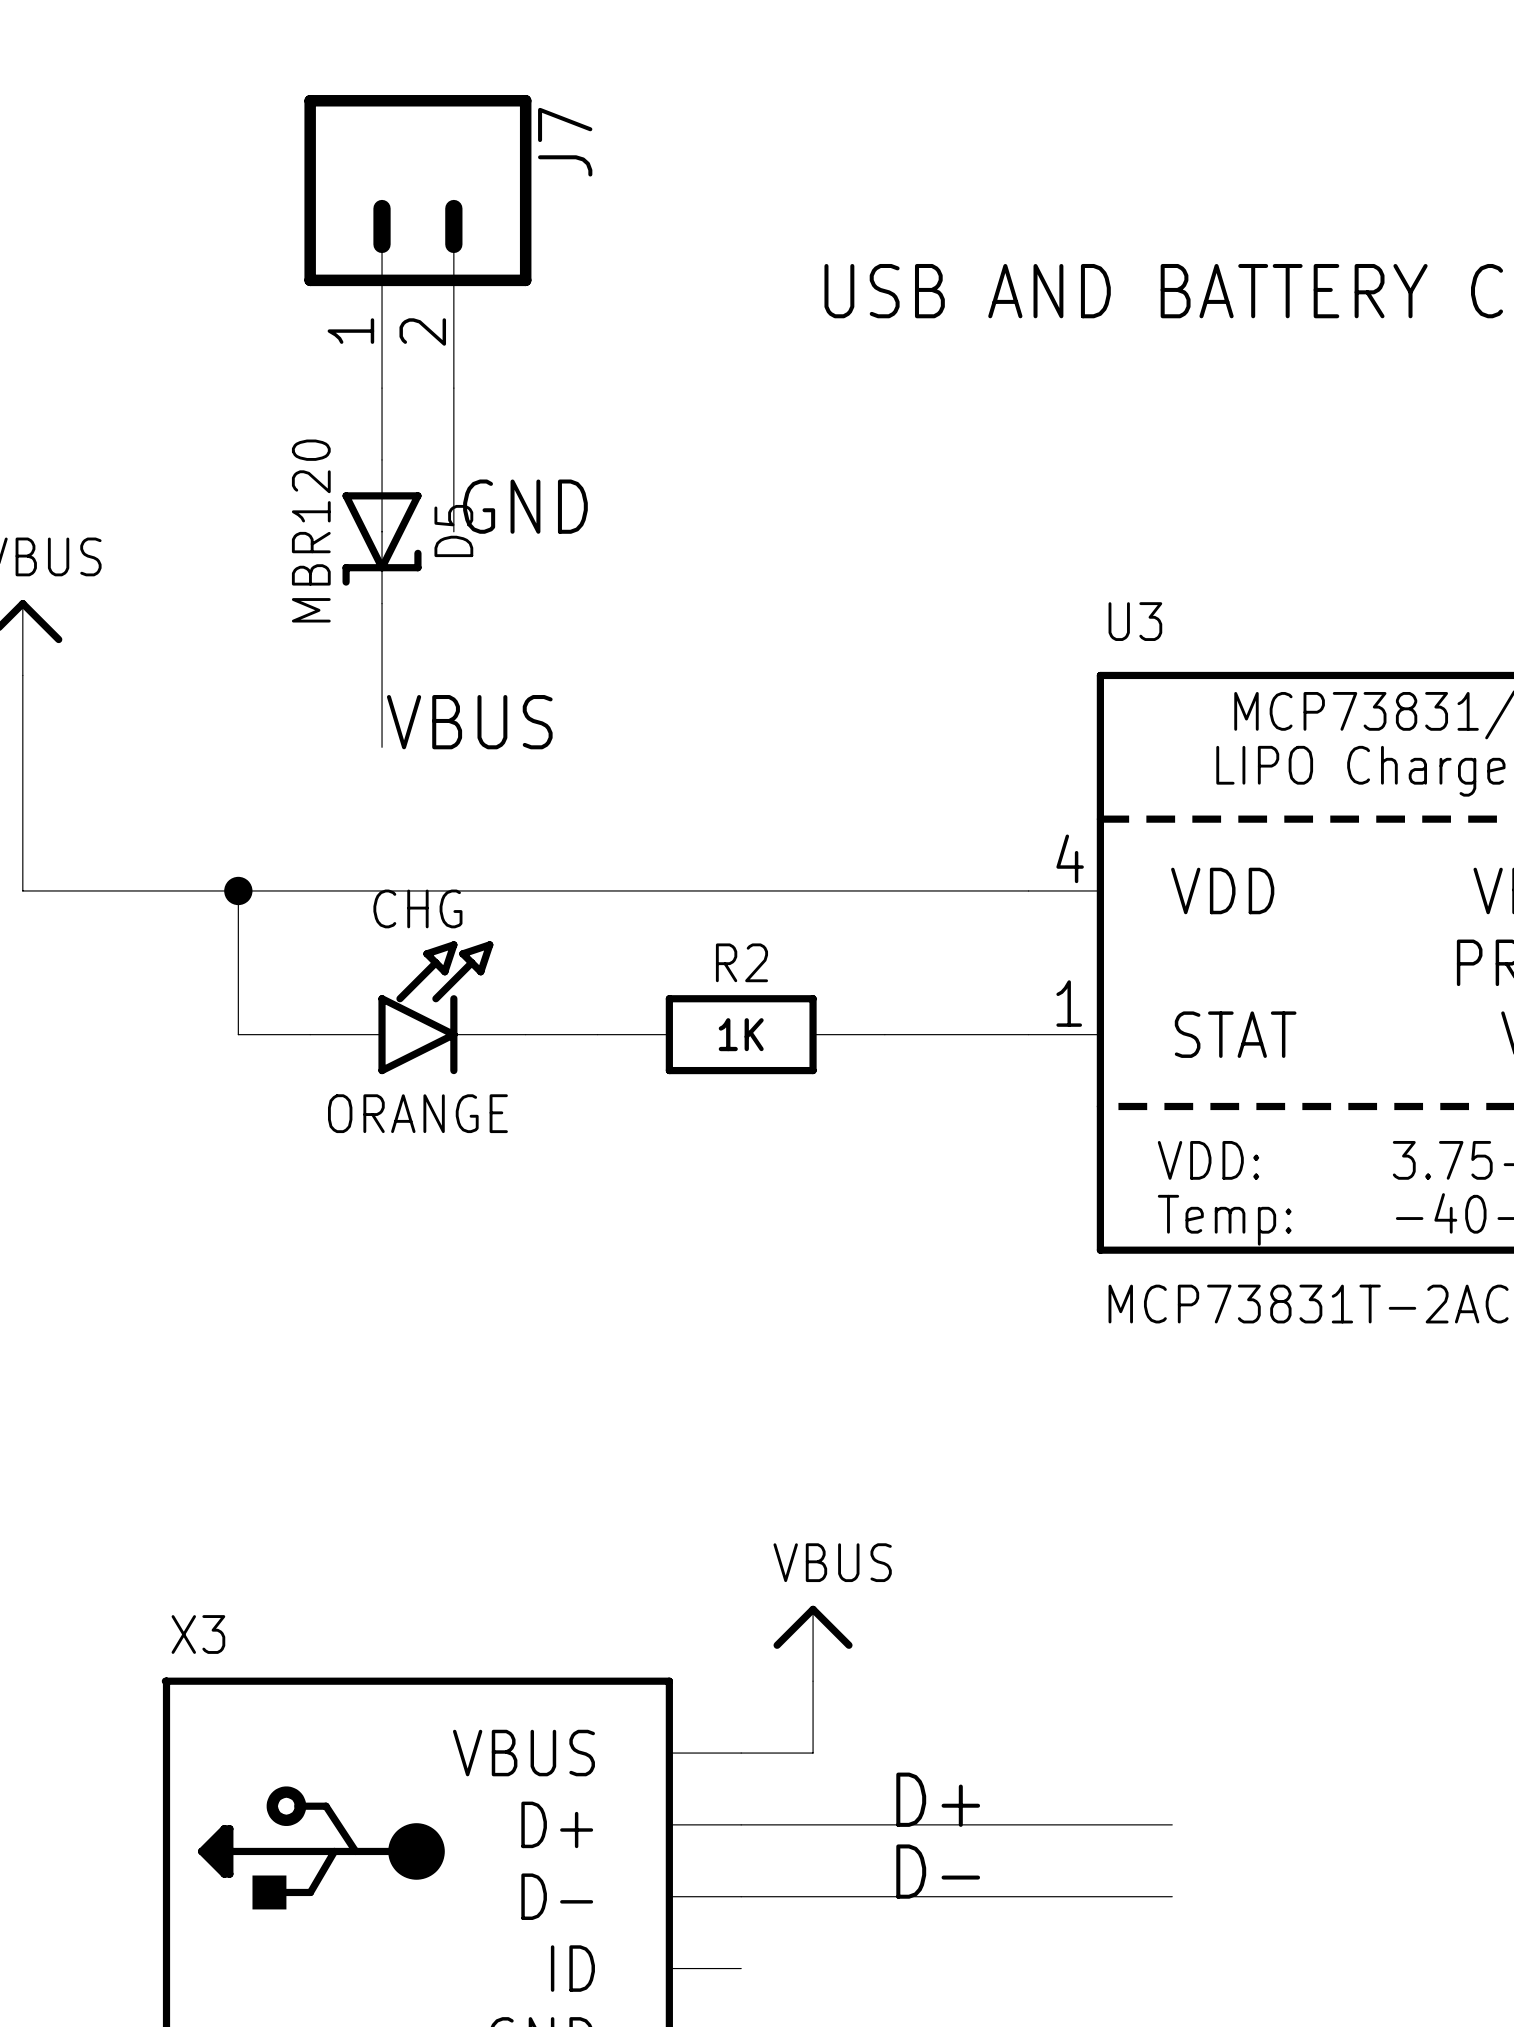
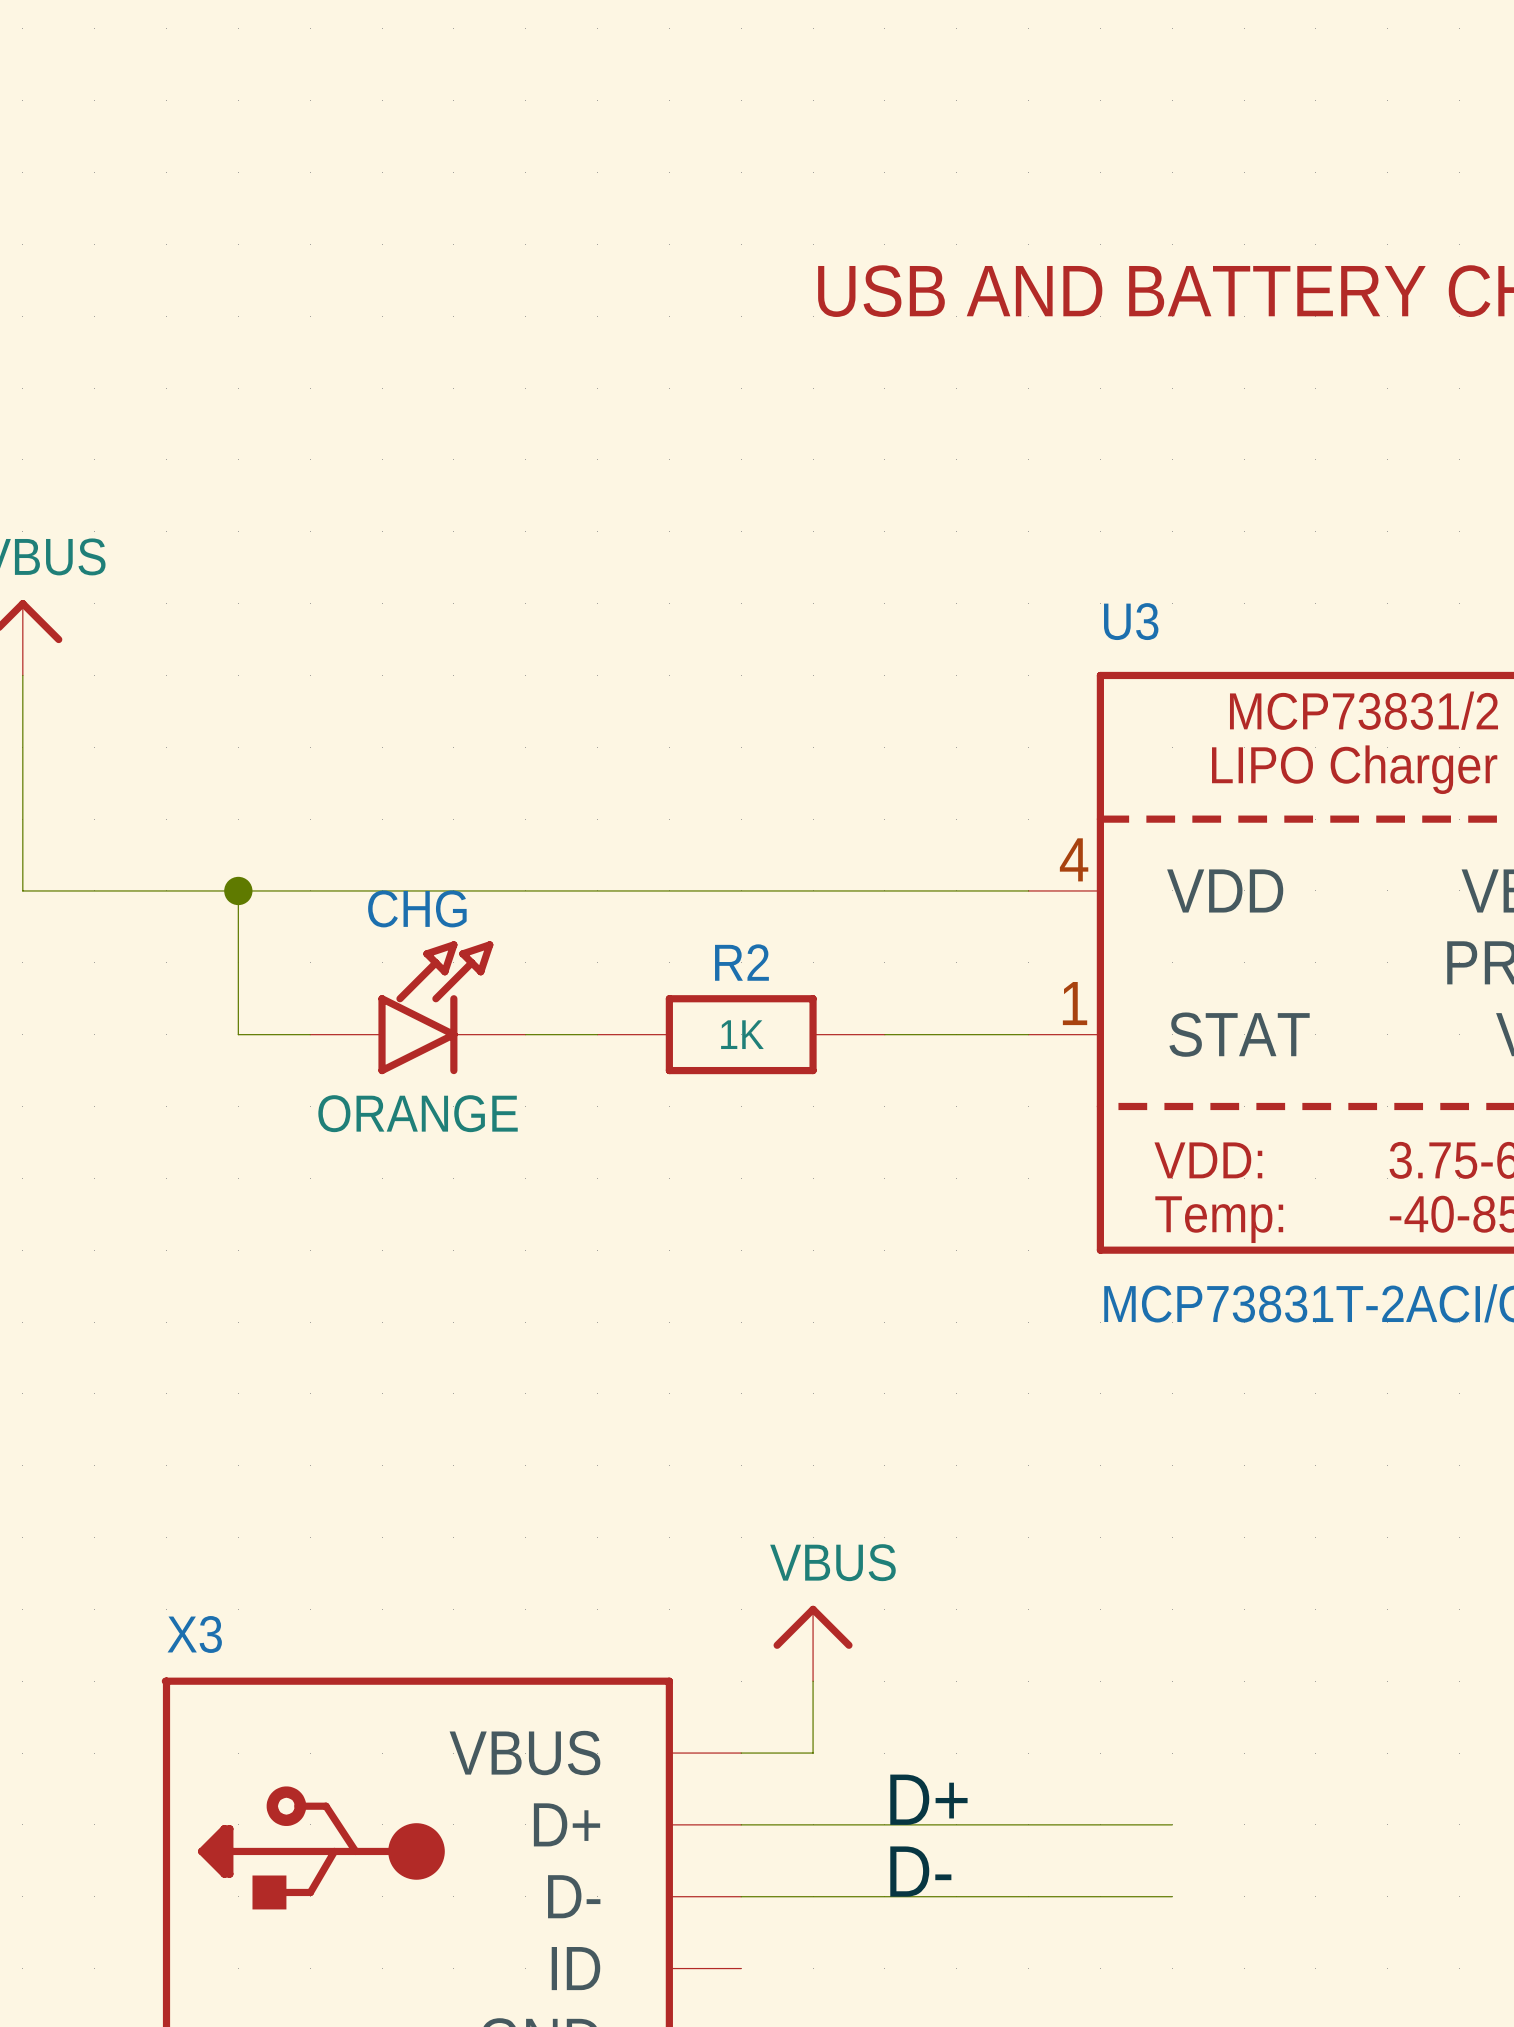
J7: (417, 241) -> none
wire: (382, 388) (382, 459) -> none
wire: (453, 388) (453, 531) -> none
label: GND (525, 506) -> none
D5: MBR120 (382, 531) -> none
wire: (382, 603) (382, 747) -> none
label: VBUS (469, 722) -> none

